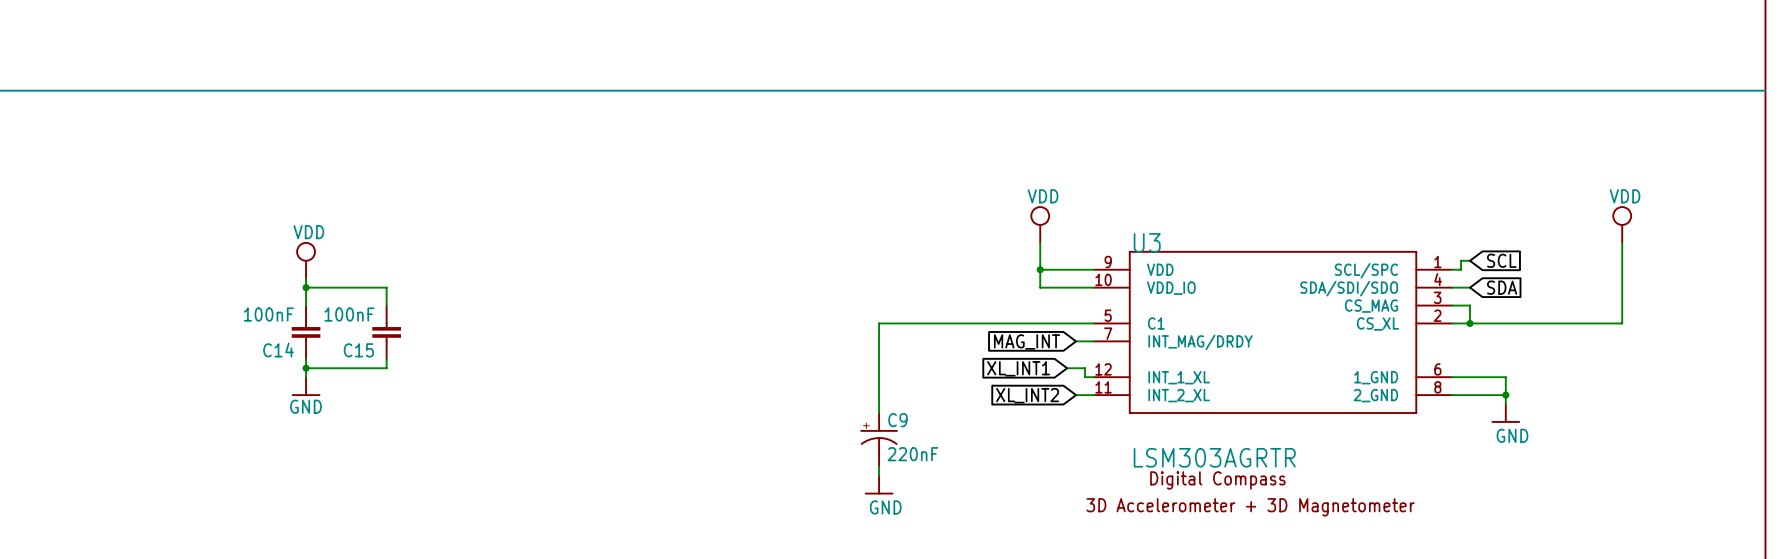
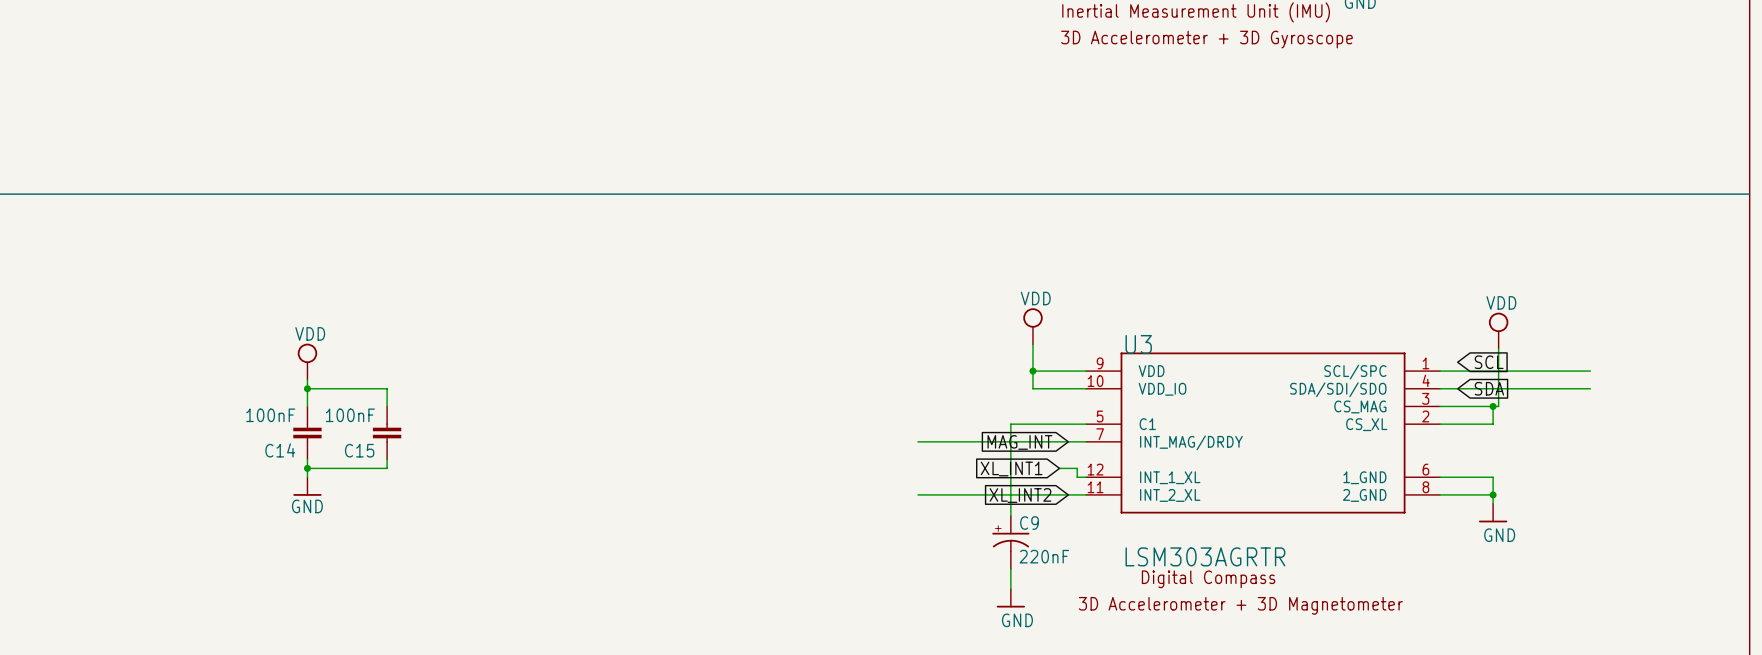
power symbol position: VDD (1622, 224) -> VDD (1498, 330)
wire: (1622, 242) (1622, 323) (1505, 323) -> (1493, 406) (1493, 424)
wire: (1470, 260) (1461, 260) (1461, 269) -> (1590, 371) (1448, 371)
wire: none -> (1457, 388) (1590, 388)
wire: (1470, 305) (1470, 323) -> (1457, 406) (1498, 406) (1498, 348)
wire: (1017, 323) (879, 323) (879, 413) -> (1010, 424) (1010, 515)
junction position: (1470, 323) -> (1493, 406)
wire: none -> (917, 441) (1068, 441)
wire: none -> (917, 494) (1068, 494)
C9 position: (879, 439) -> (1010, 542)
wire: (879, 466) (879, 475) -> none
wire: none -> (1010, 569) (1010, 588)
power symbol position: GND (879, 485) -> GND (1010, 598)

